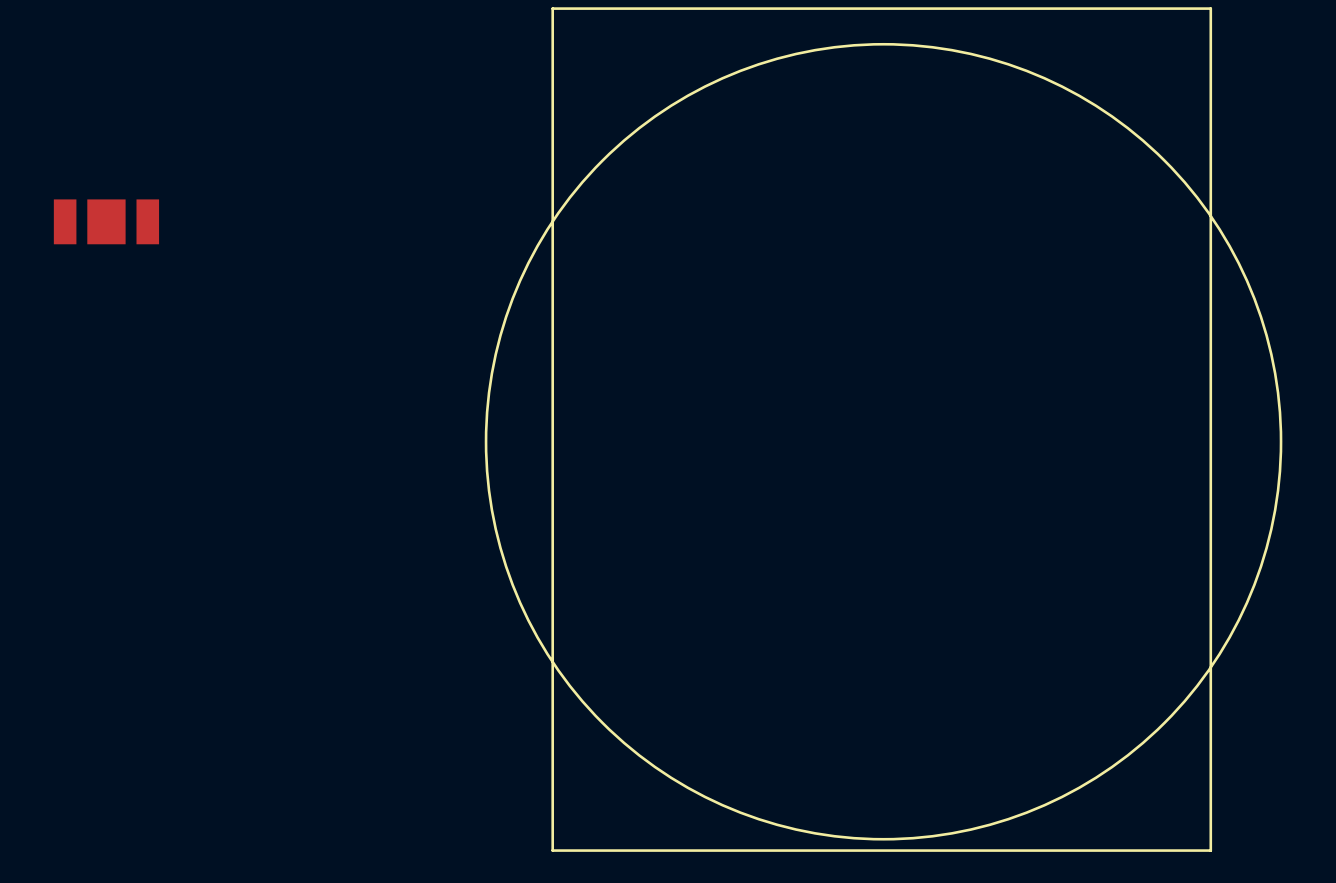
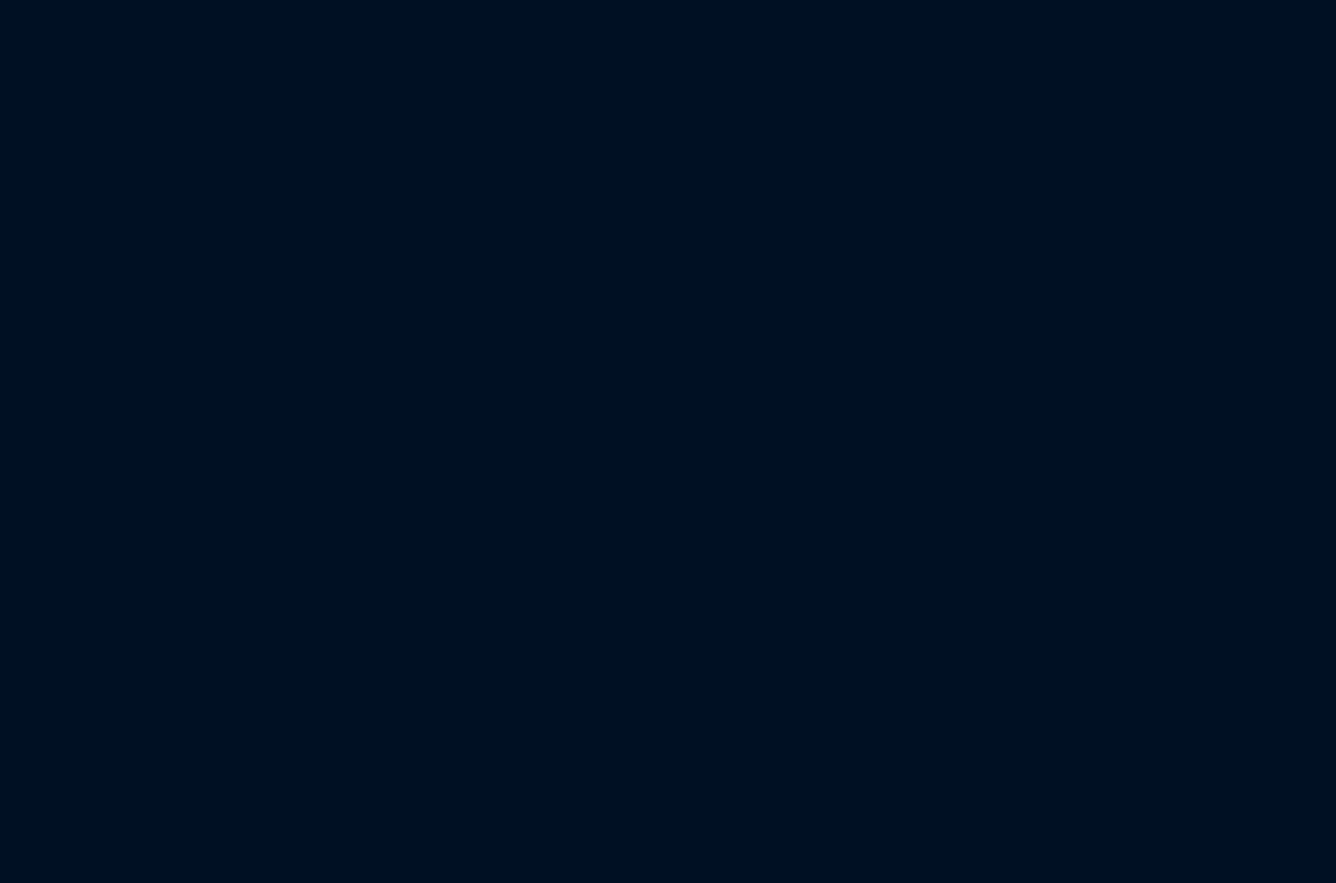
line: (1210, 8) (552, 8) (552, 850) (1210, 850) (1210, 8) -> none
drawing: [484, 42, 1283, 841] -> none
part: (106, 221) -> none

